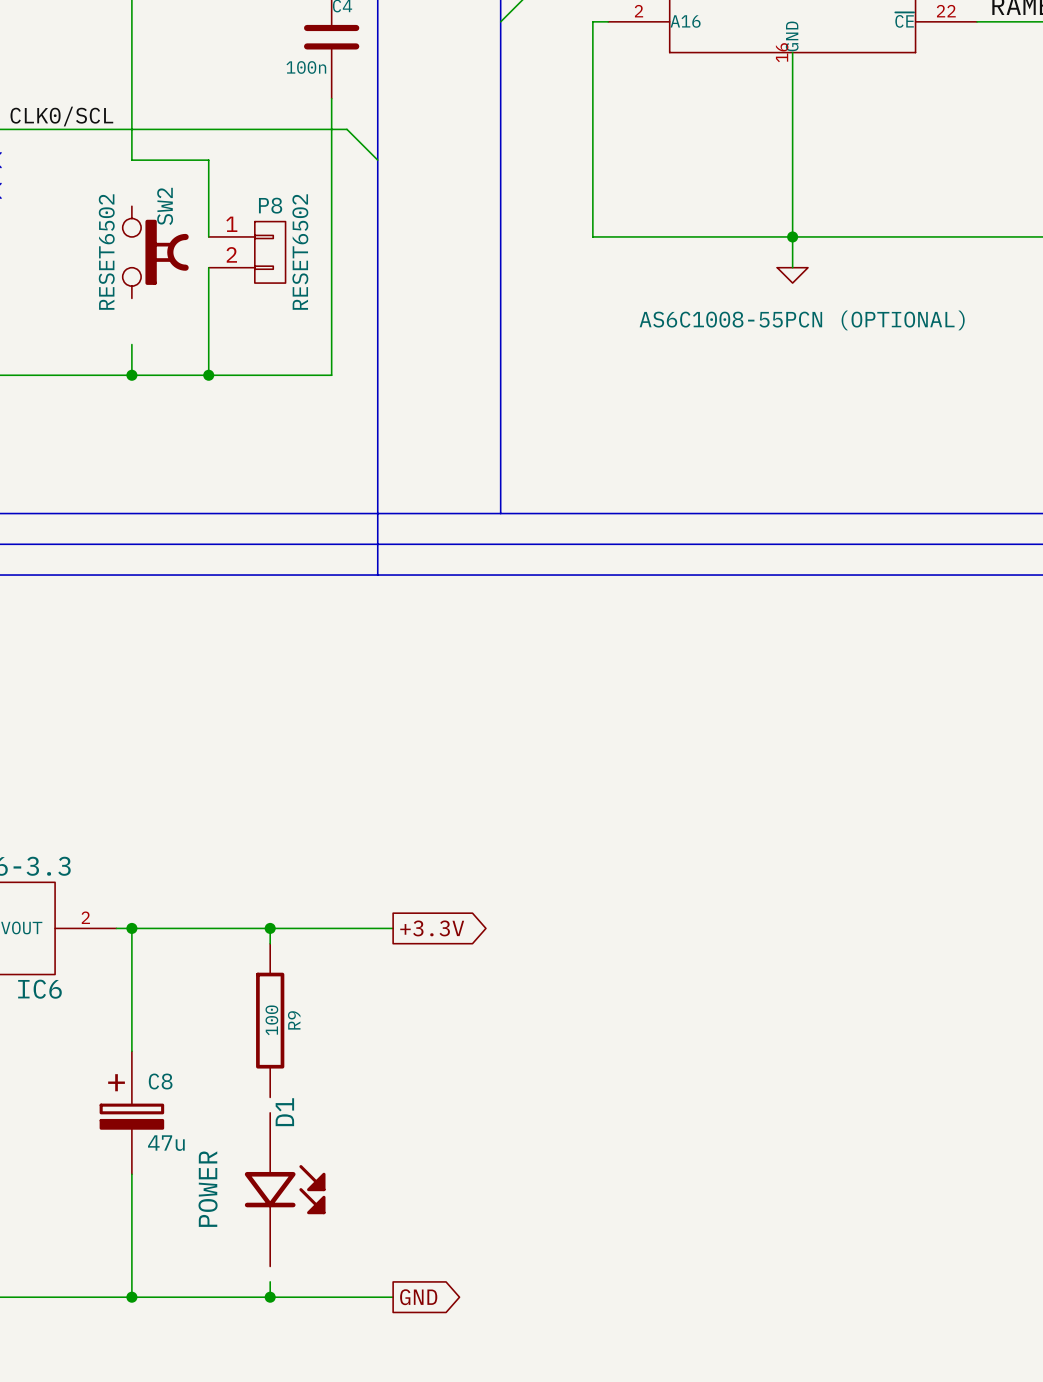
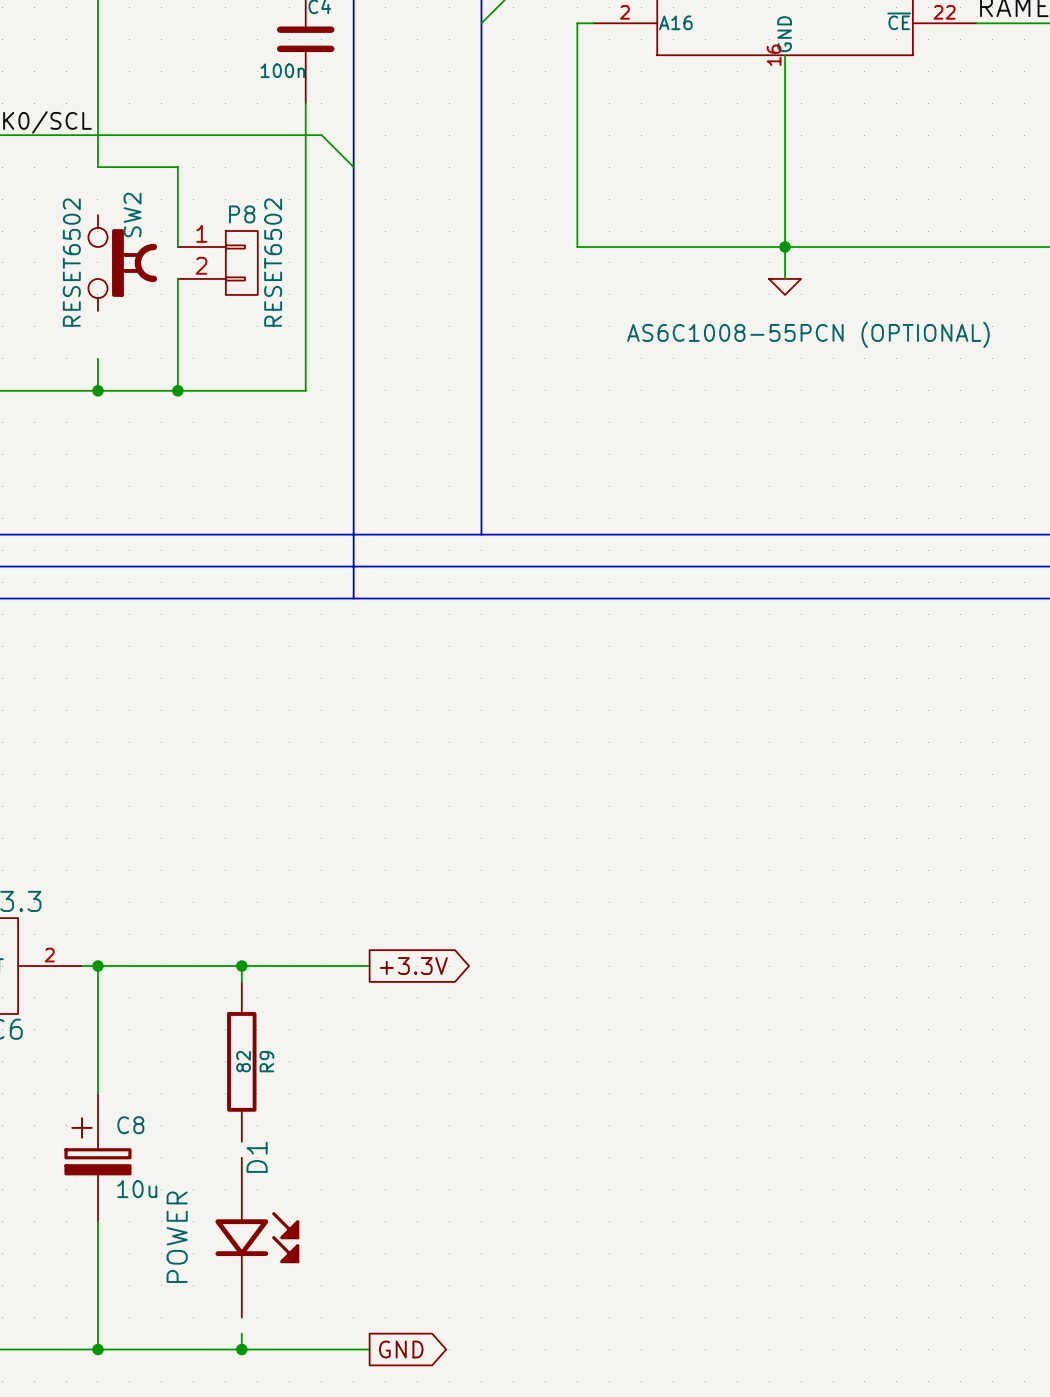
R9 value: 100 (271, 1020) -> 82 (243, 1061)
C8 value: 47u (166, 1143) -> 10u (137, 1189)

